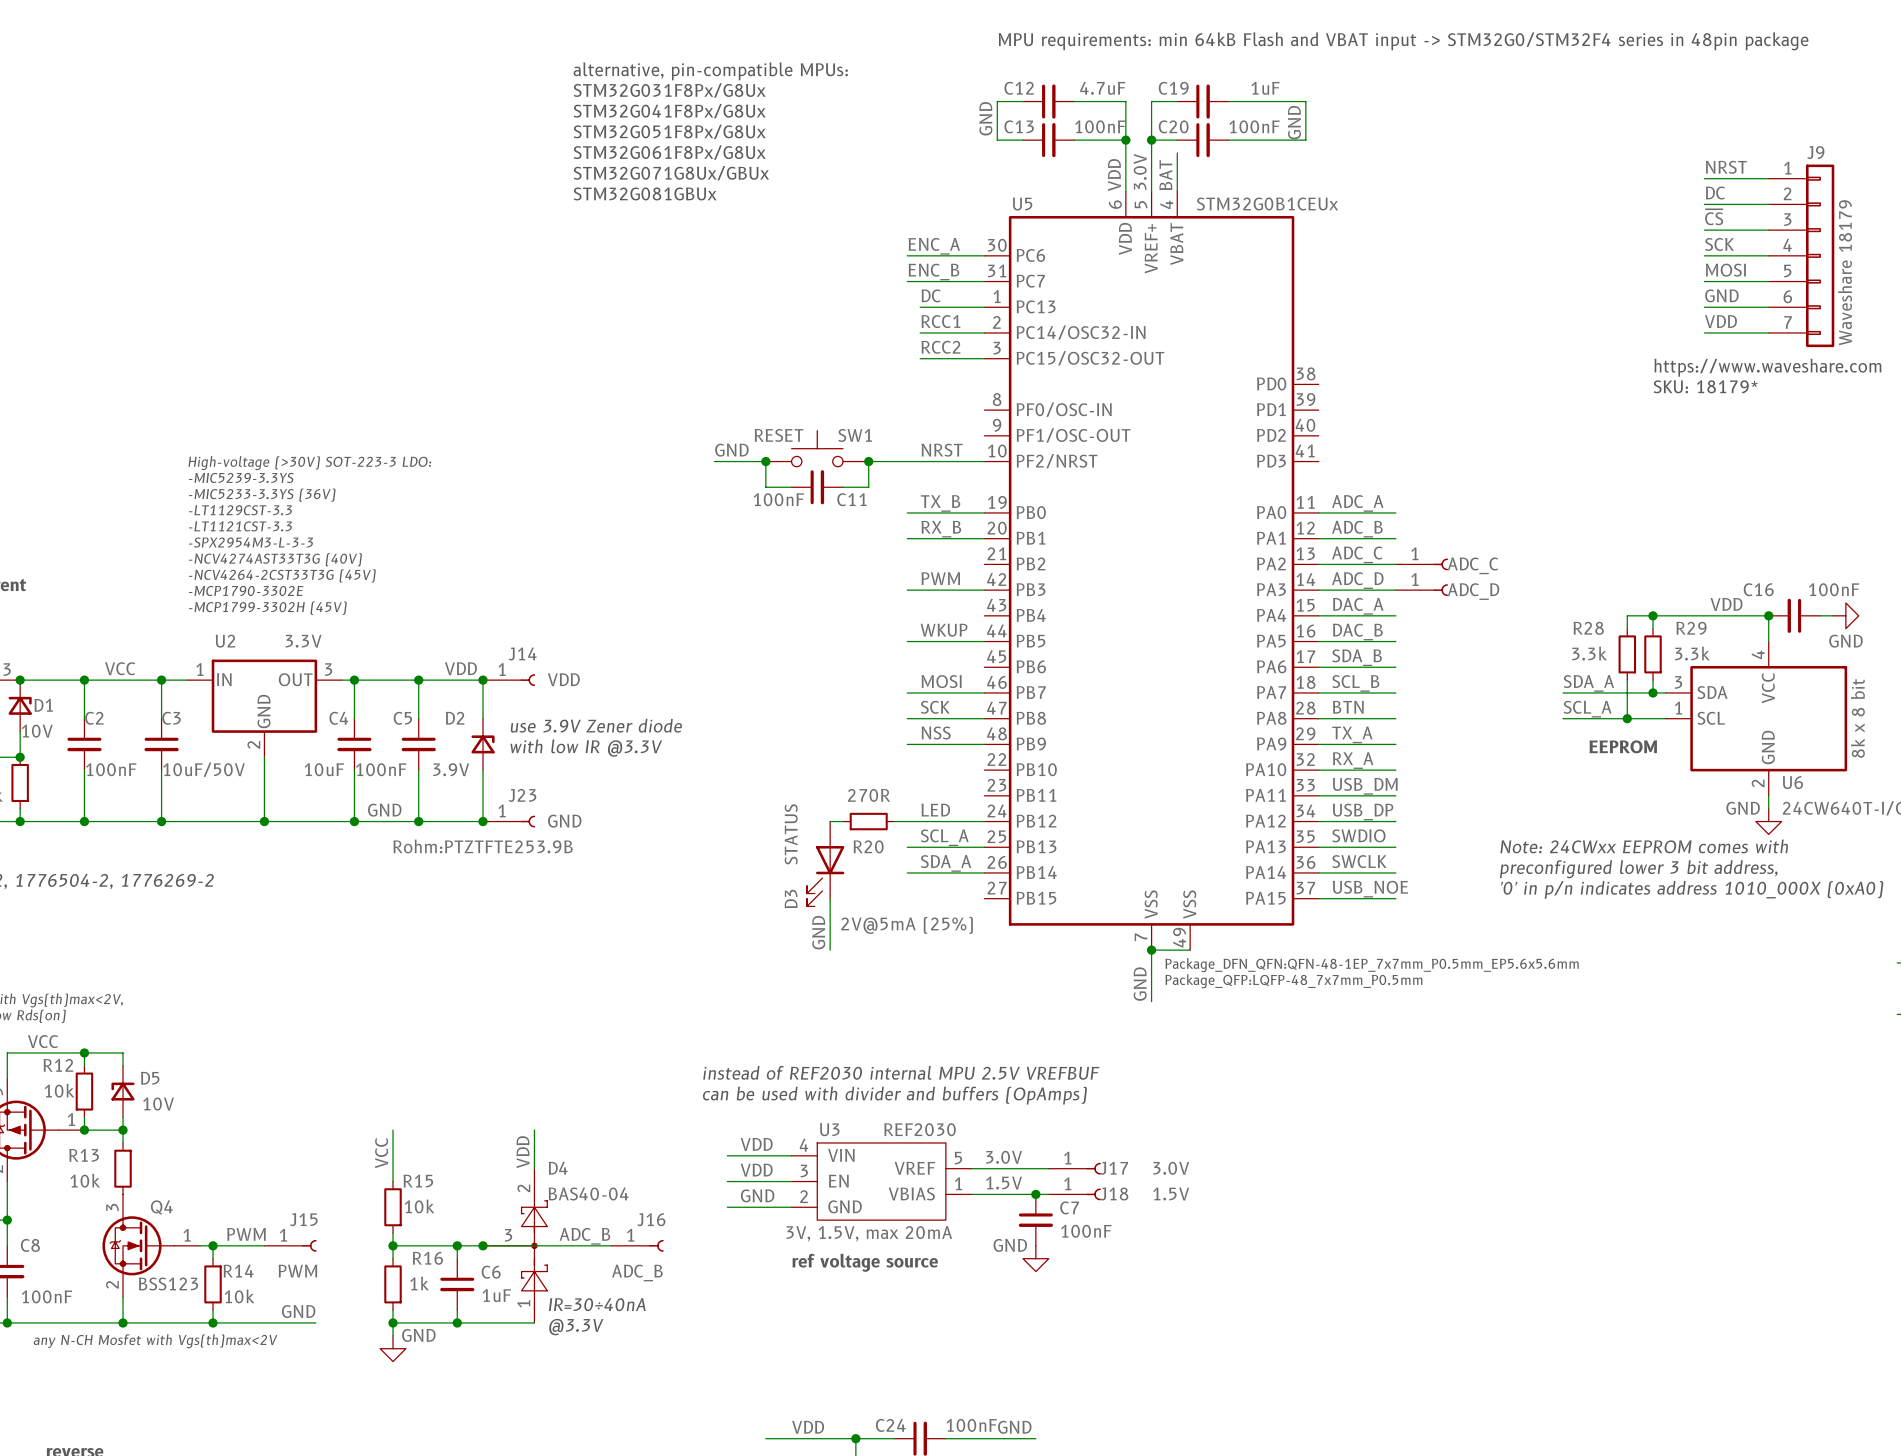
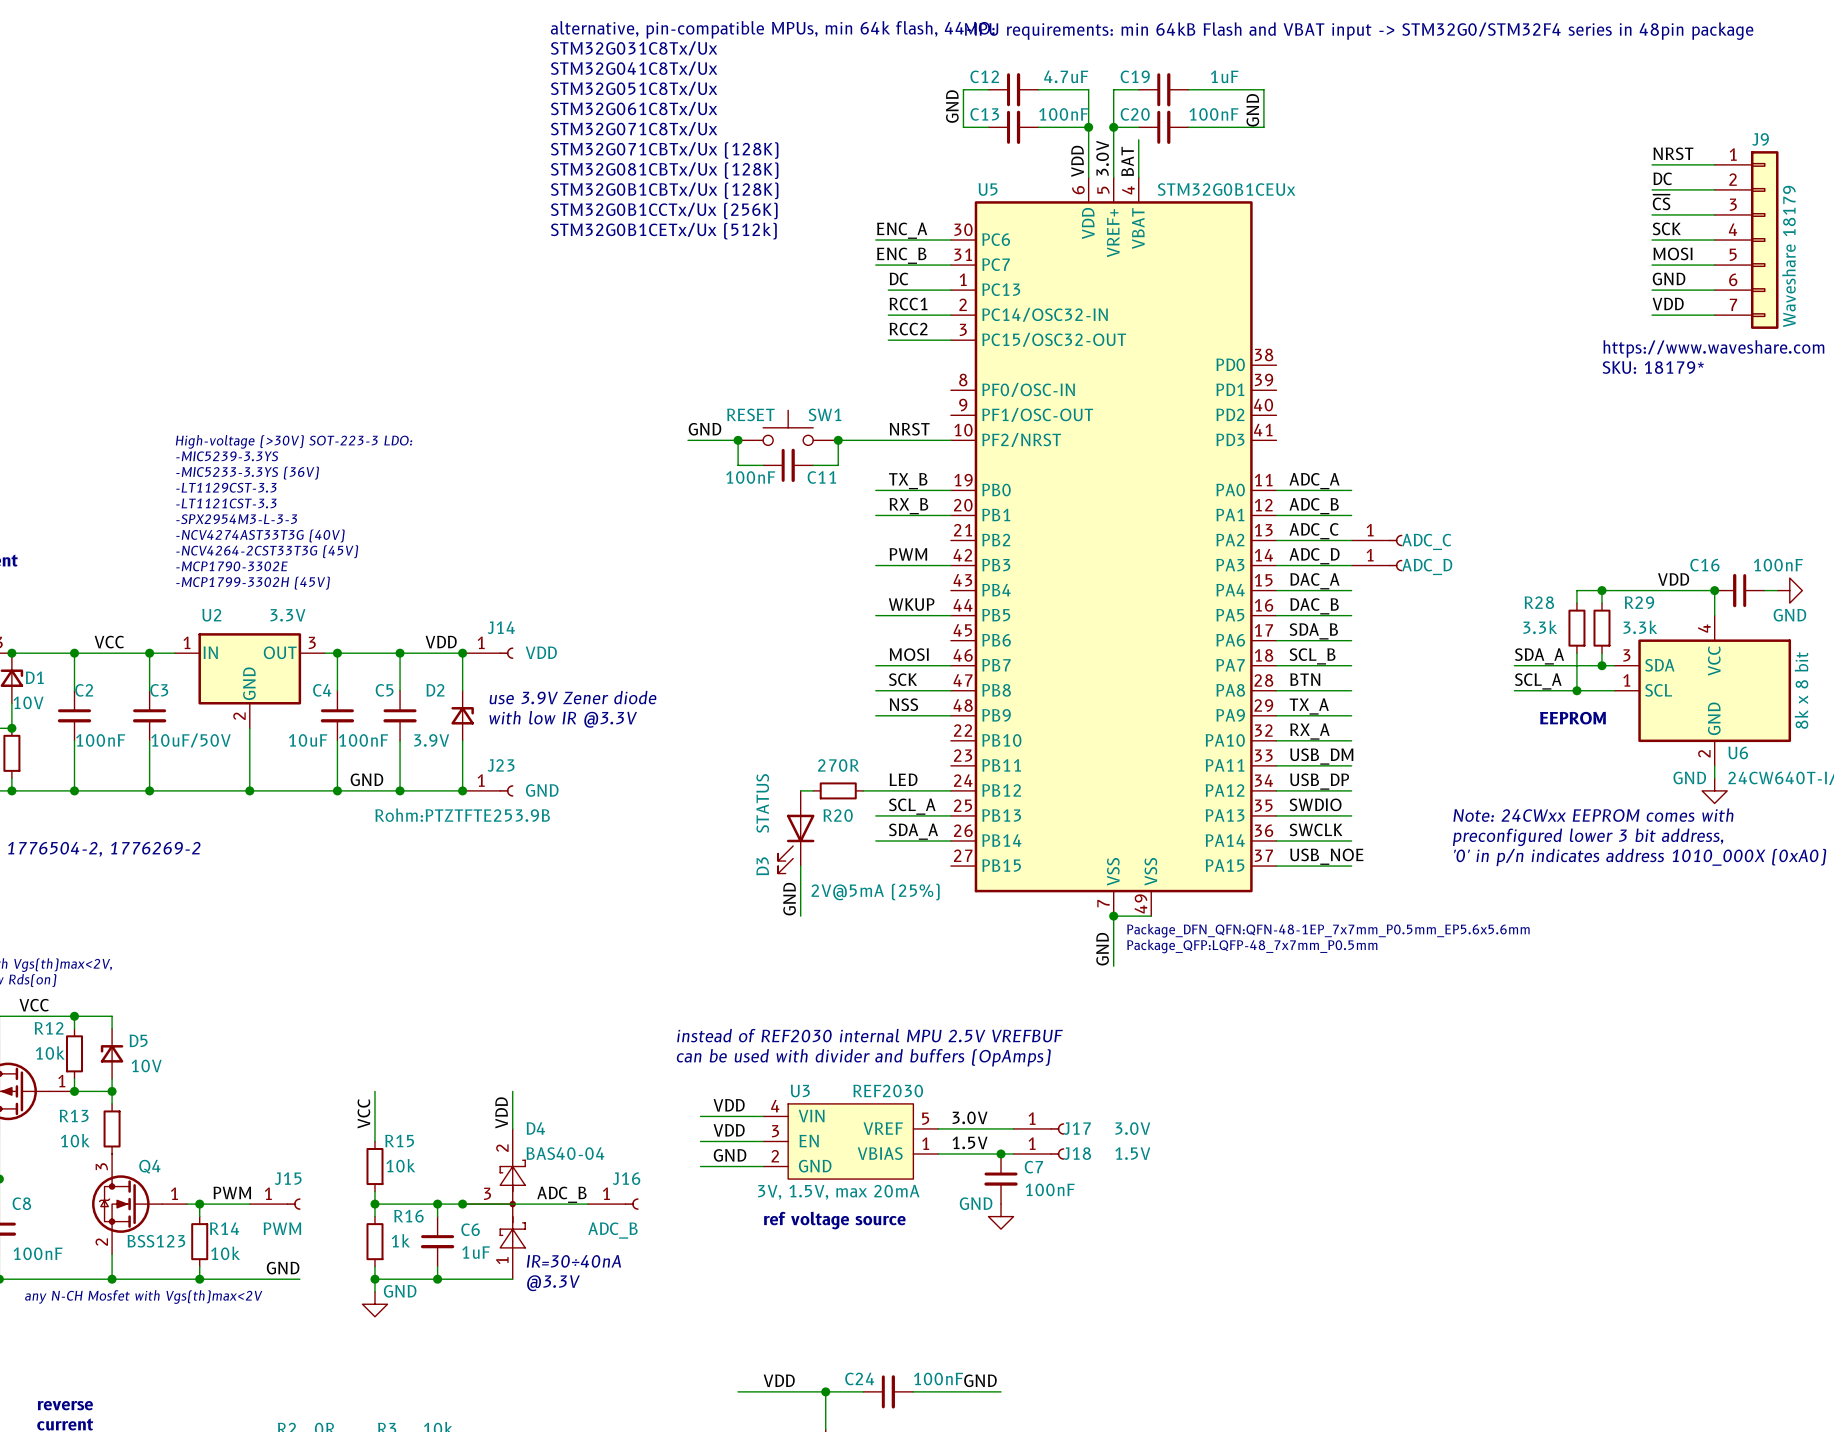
text: none -> alternative, pin-compatible MPUs, min 64k flash, 44-IO: (772, 29)
text: none -> STM32G031C8Tx/Ux (634, 48)
text: alternative, pin-compatible MPUs: (710, 71) -> none
text: none -> STM32G041C8Tx/Ux (634, 68)
text: STM32G031F8Px/G8Ux (669, 90) -> none
text: none -> STM32G051C8Tx/Ux (634, 88)
text: STM32G041F8Px/G8Ux (669, 111) -> none
text: none -> STM32G061C8Tx/Ux (634, 108)
text: STM32G051F8Px/G8Ux (669, 131) -> none
text: none -> STM32G071C8Tx/Ux (634, 129)
text: STM32G061F8Px/G8Ux (669, 152) -> none
text: none -> STM32G071CBTx/Ux (128K) (664, 150)
text: STM32G071G8Ux/GBUx (671, 173) -> none
text: none -> STM32G081CBTx/Ux (128K) (664, 170)
text: STM32G081GBUx (645, 193) -> none
text: none -> STM32G0B1CBTx/Ux (128K) (664, 190)
text: none -> STM32G0B1CCTx/Ux (256K) (664, 211)
text: none -> STM32G0B1CETx/Ux (512k) (663, 231)

